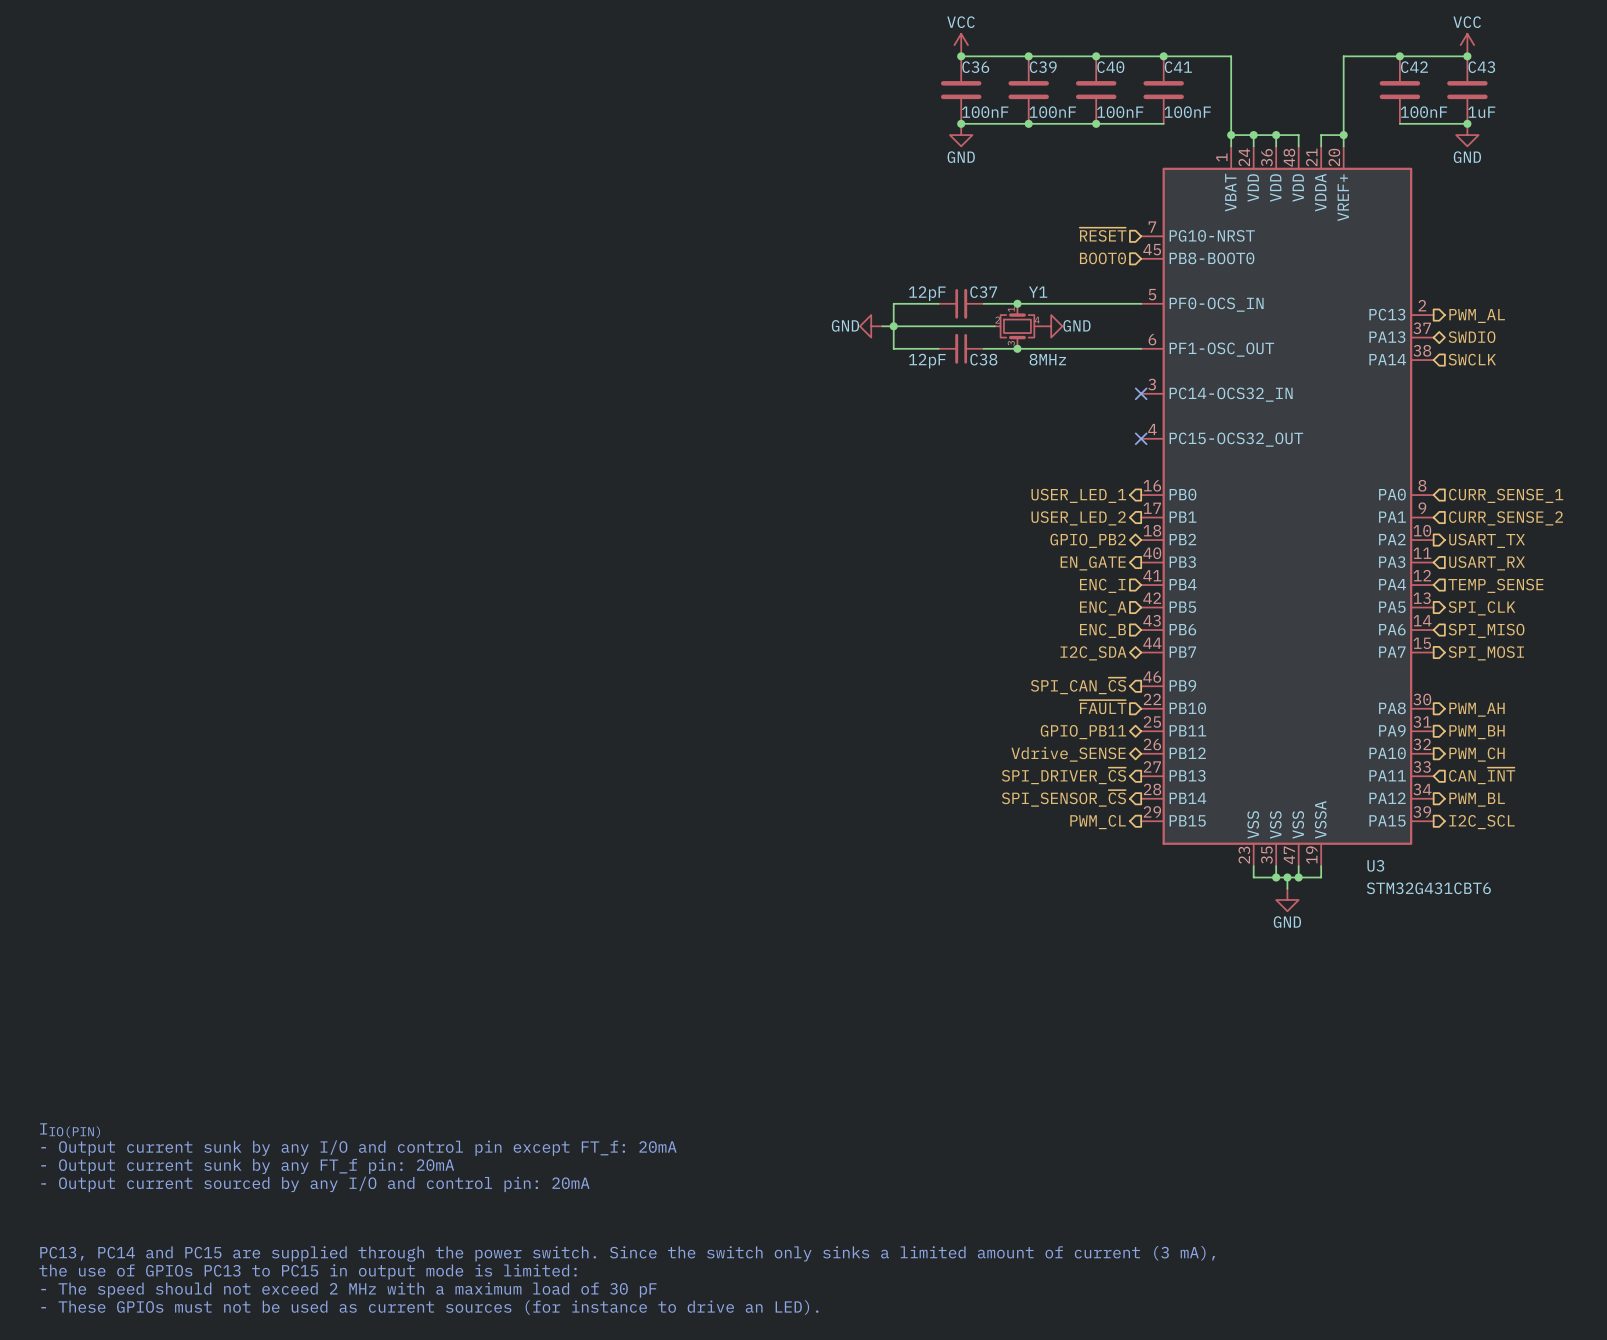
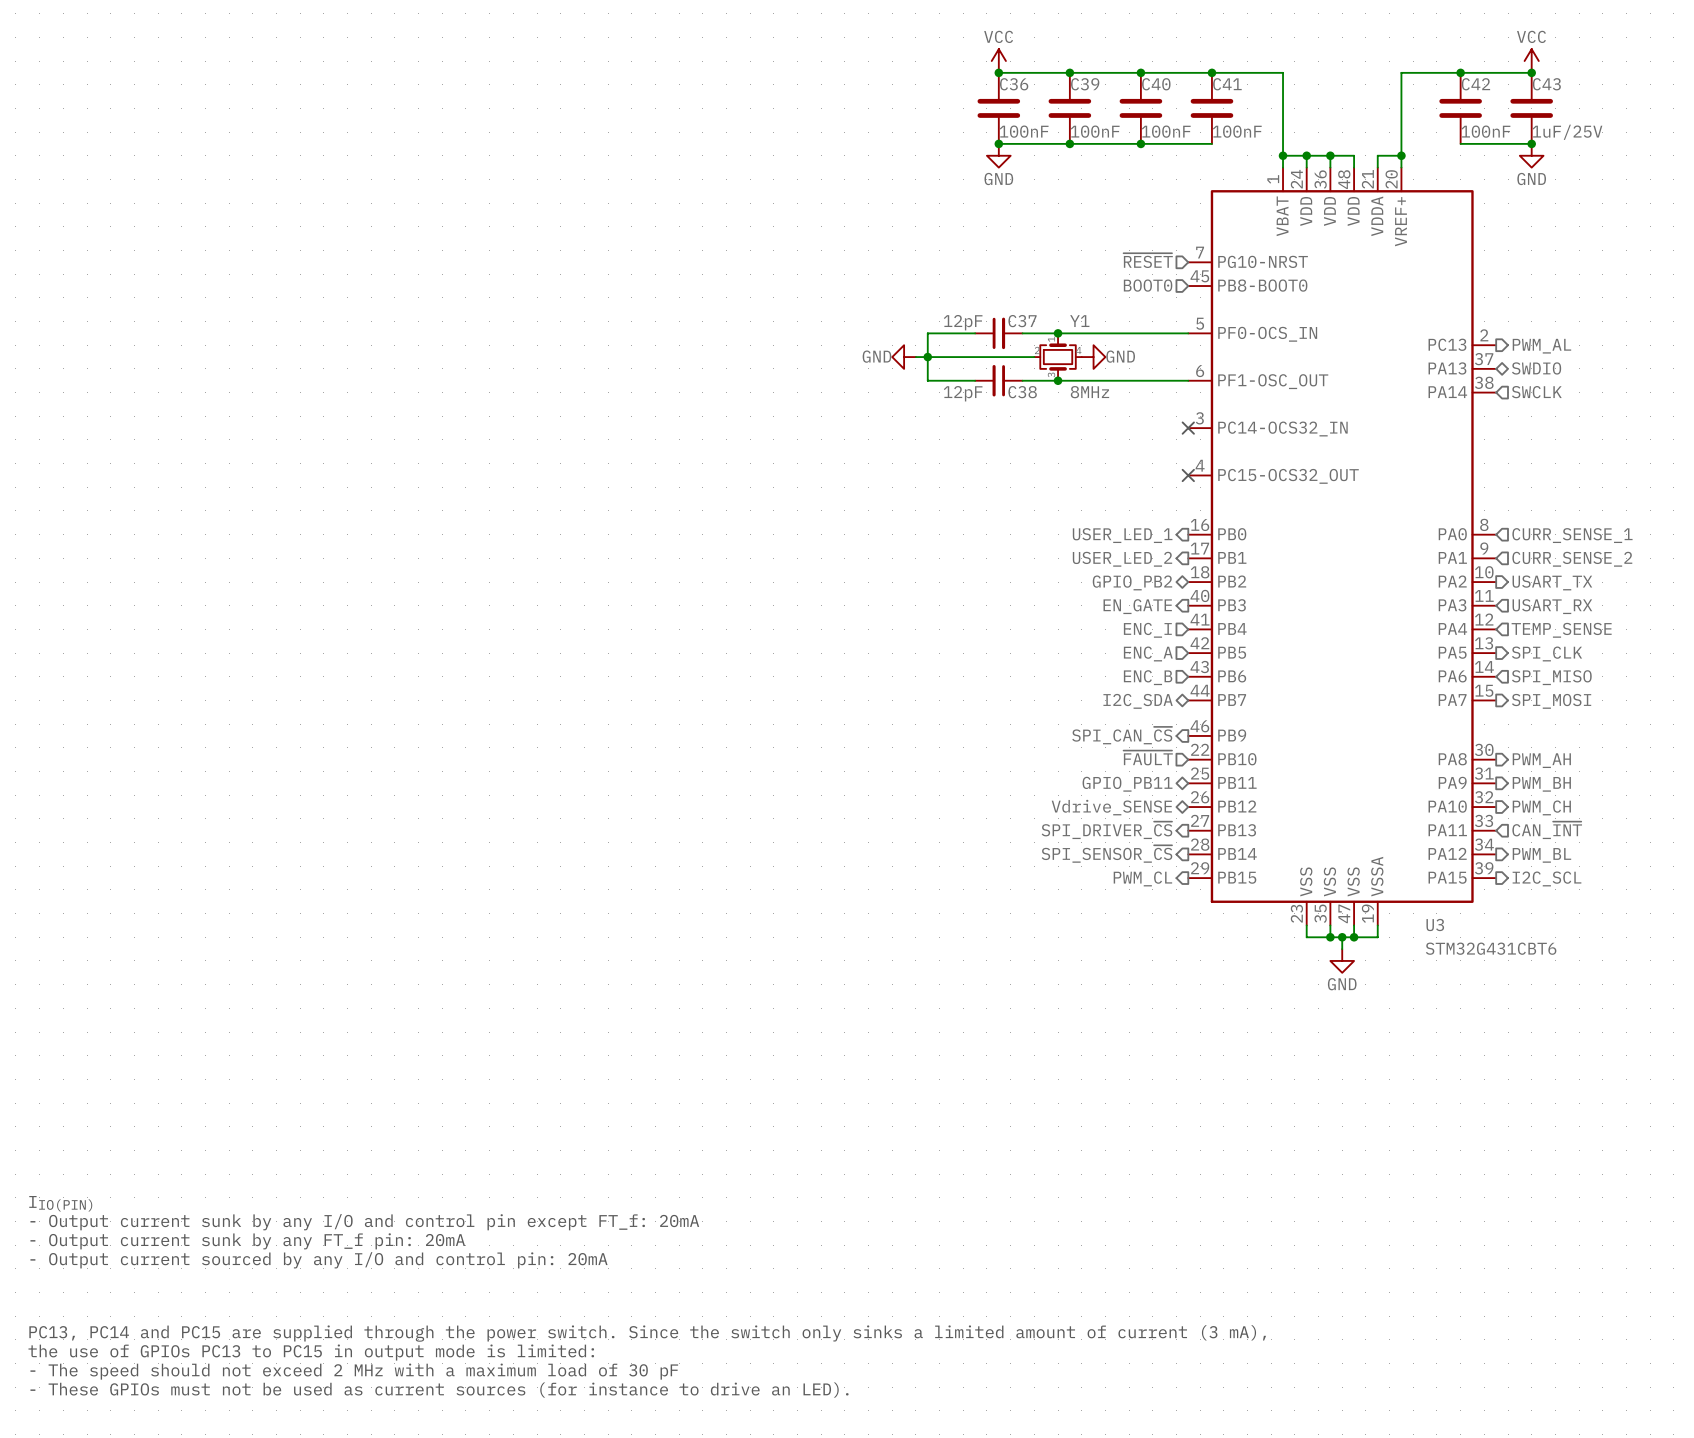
C43 value: 1uF (1481, 112) -> 1uF/25V (1567, 132)

